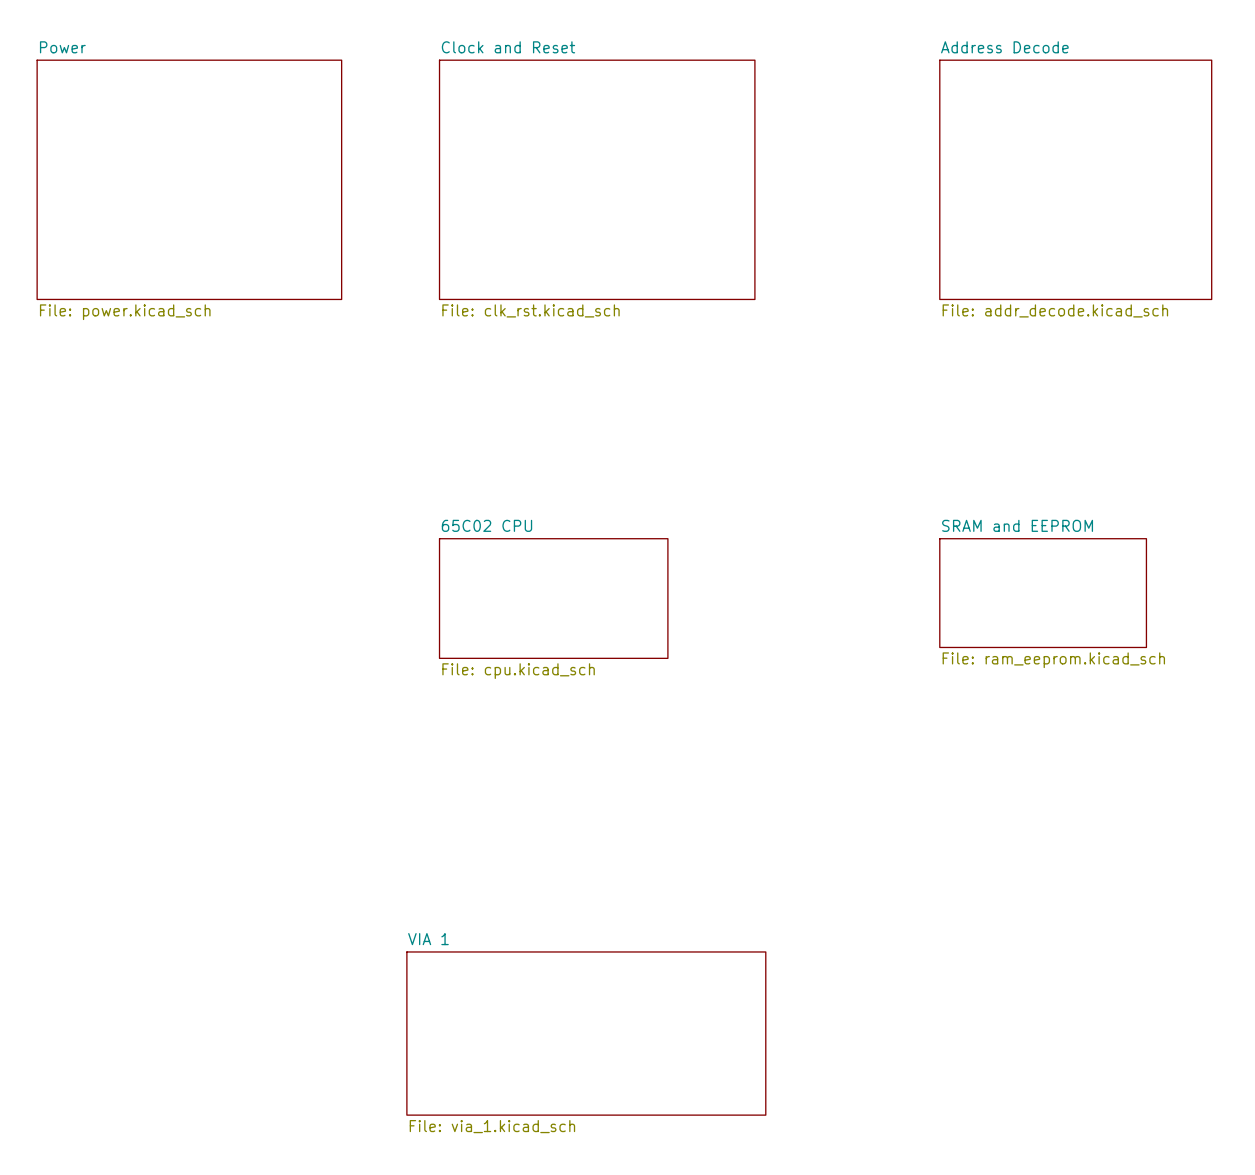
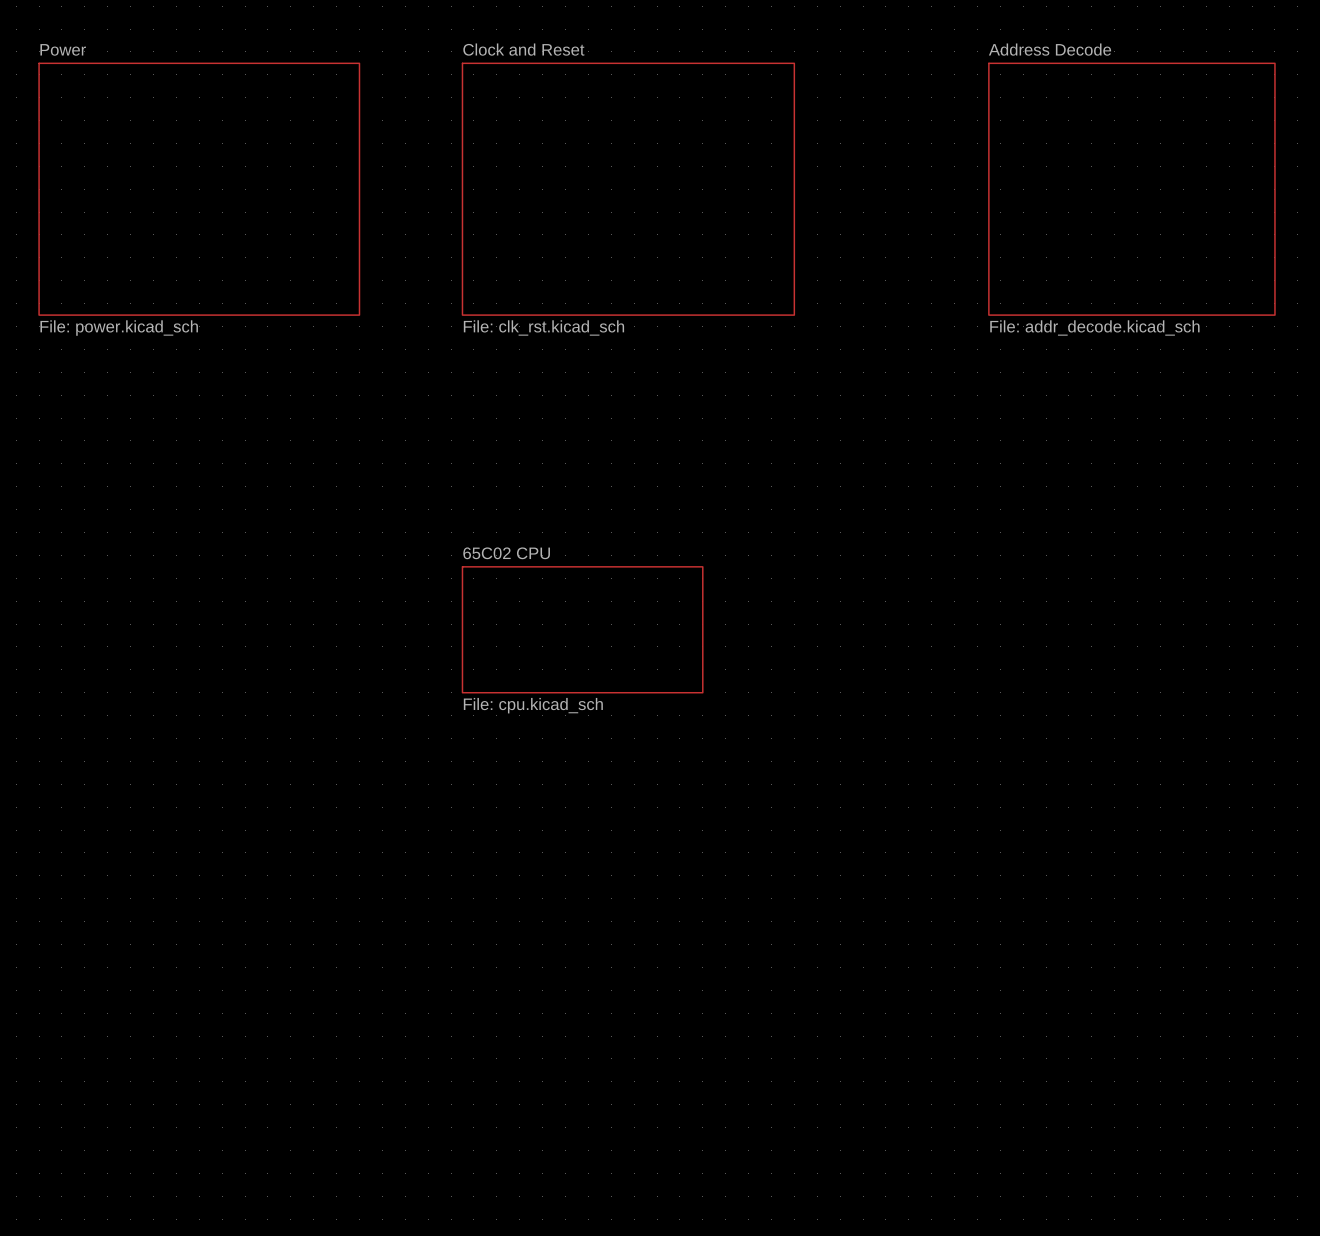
sheet SRAM and EEPROM: File: ram_eeprom.kicad_sch (1043, 593) -> none
sheet VIA 1: File: via_1.kicad_sch (586, 1033) -> none

